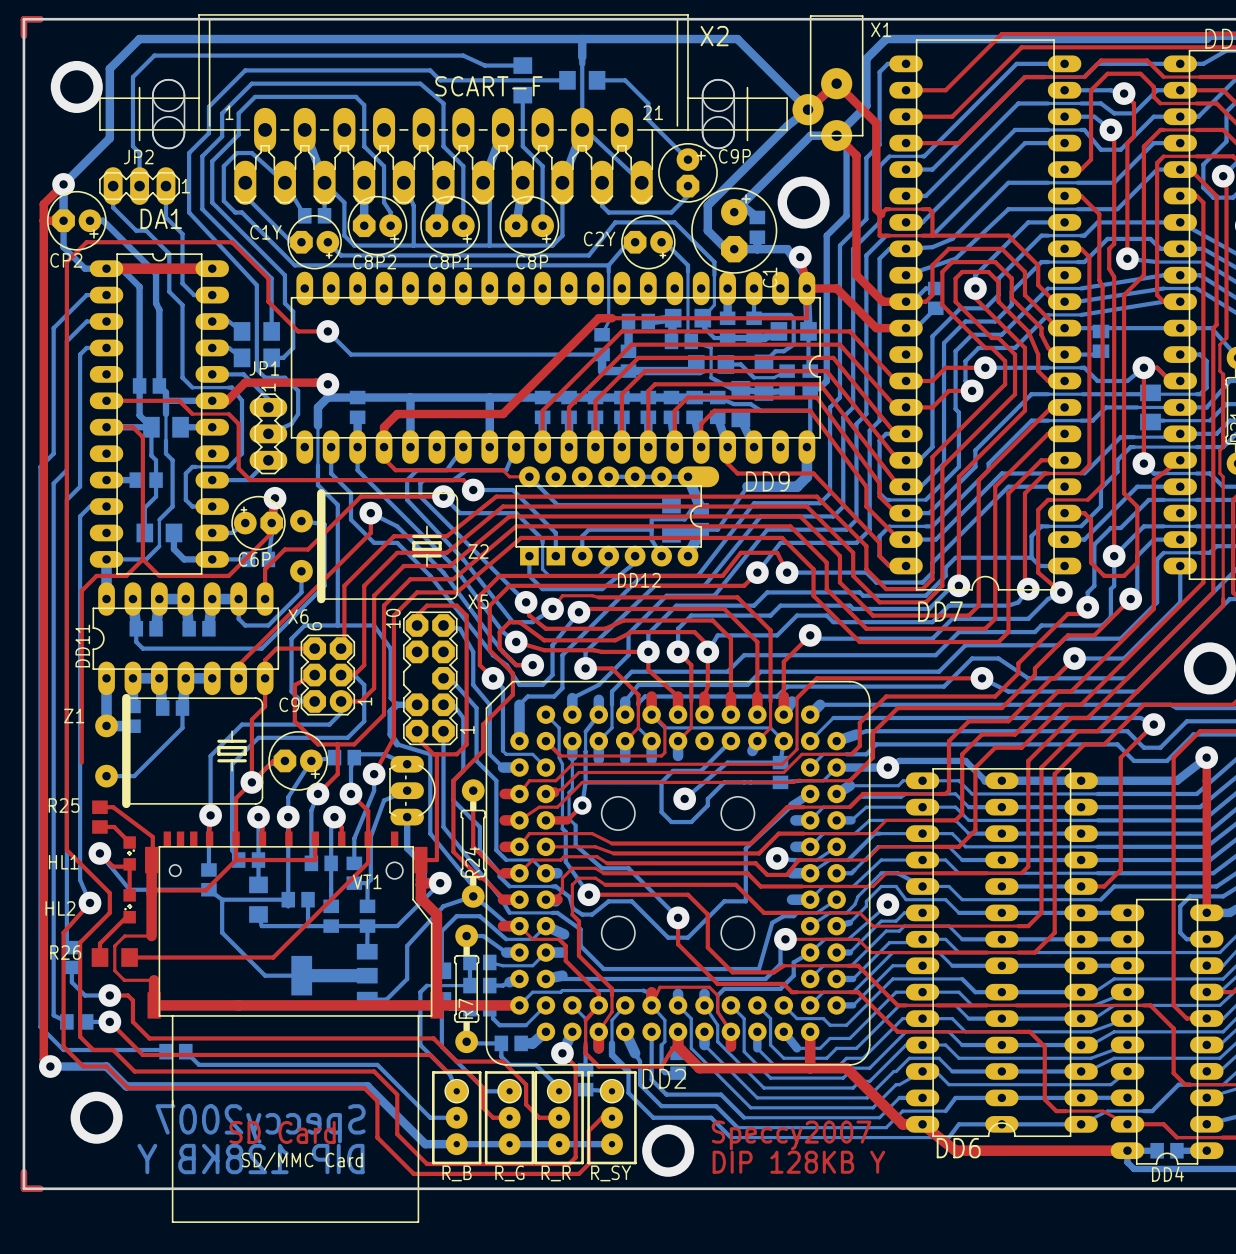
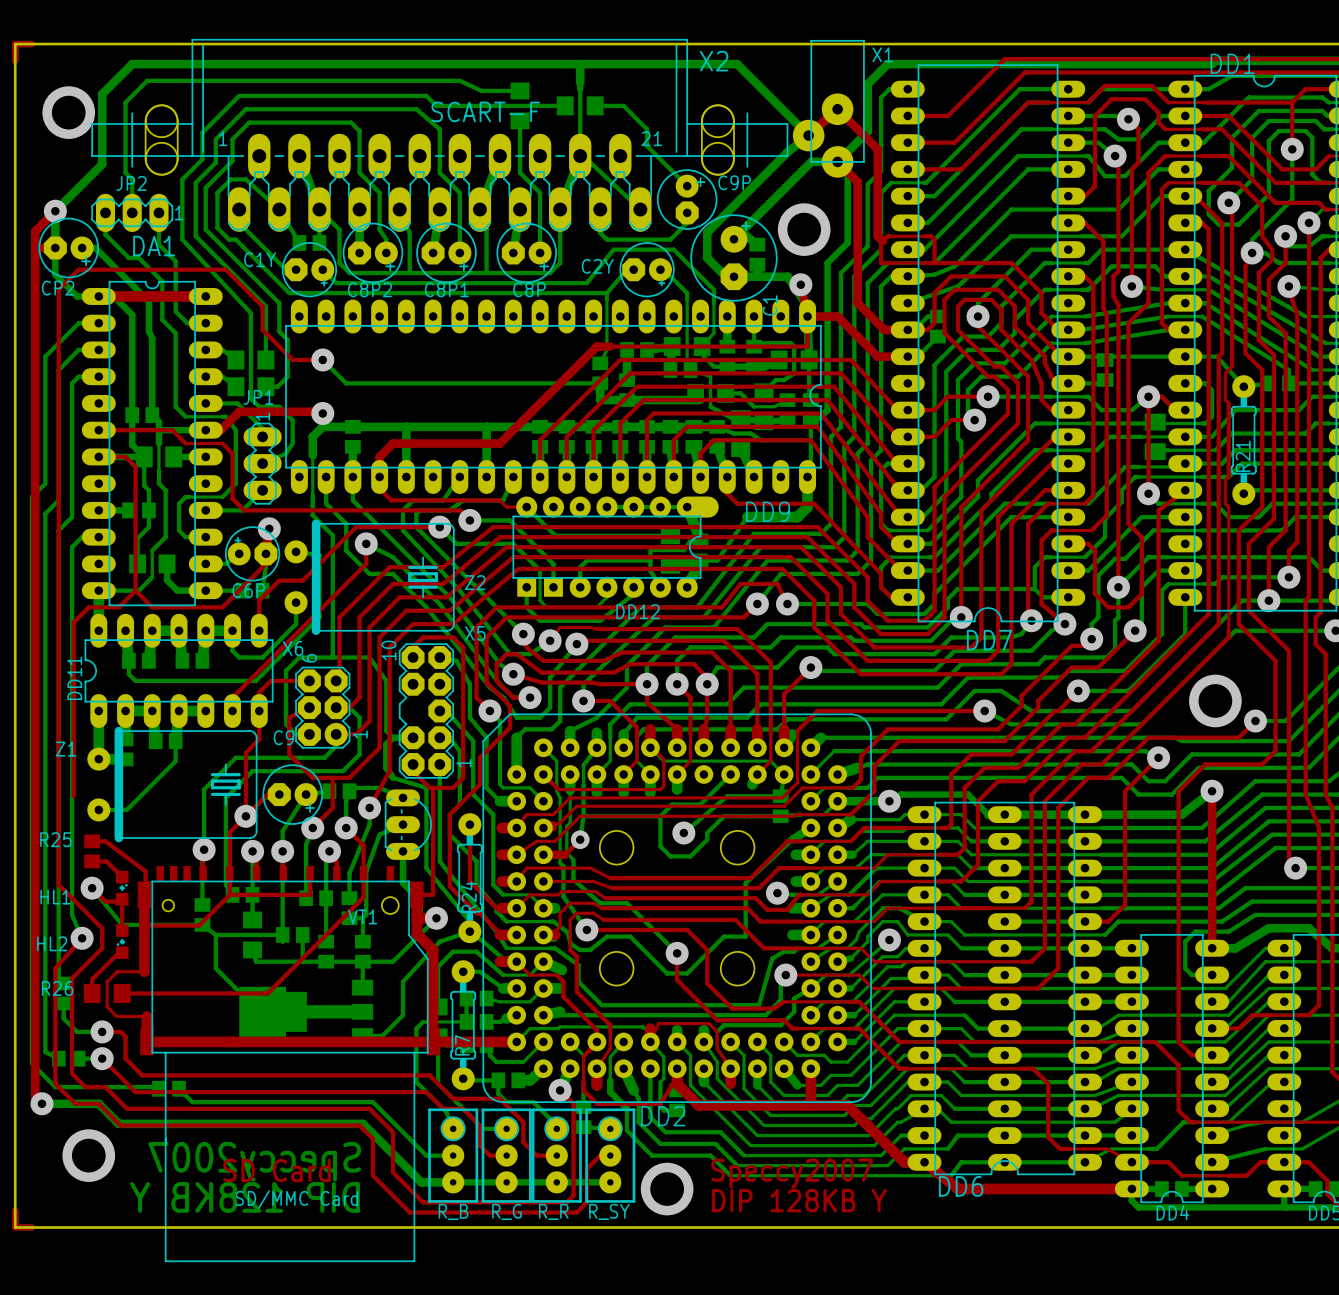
DD7 name position: DD7 (940, 611) -> DD7 (989, 640)
drawing: none -> [239, 986, 287, 1037]

